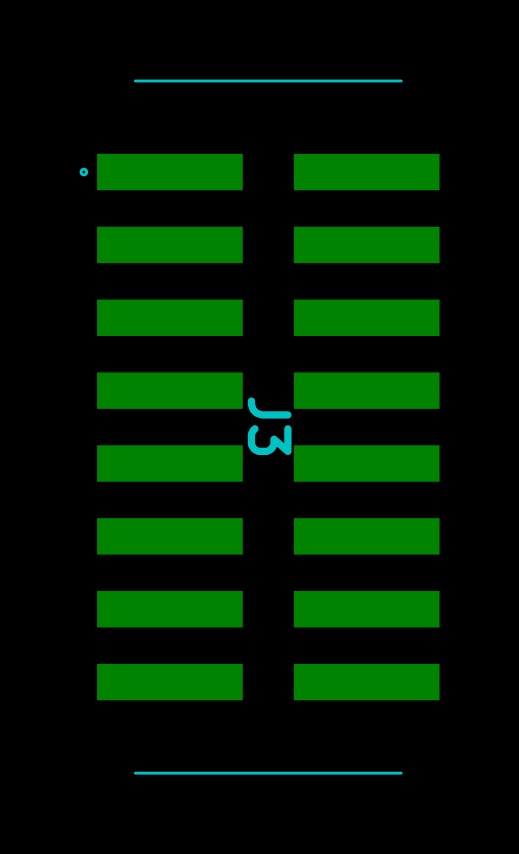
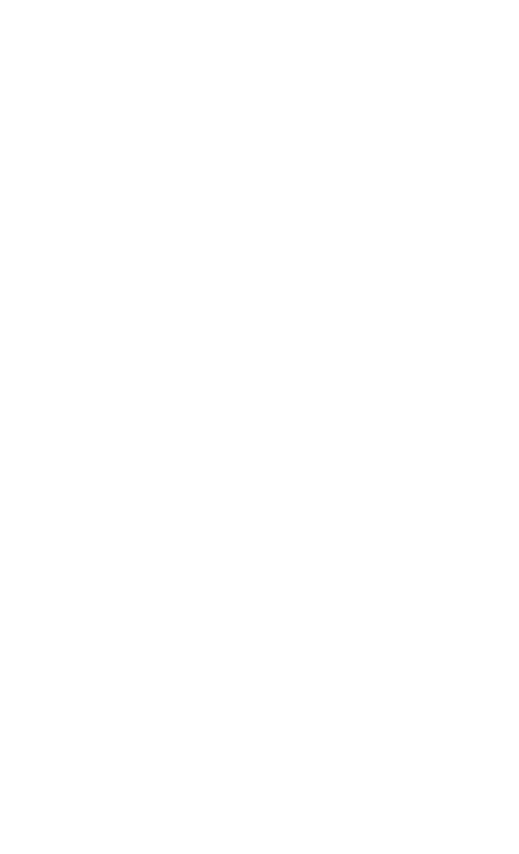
J3: (259, 427) -> none

